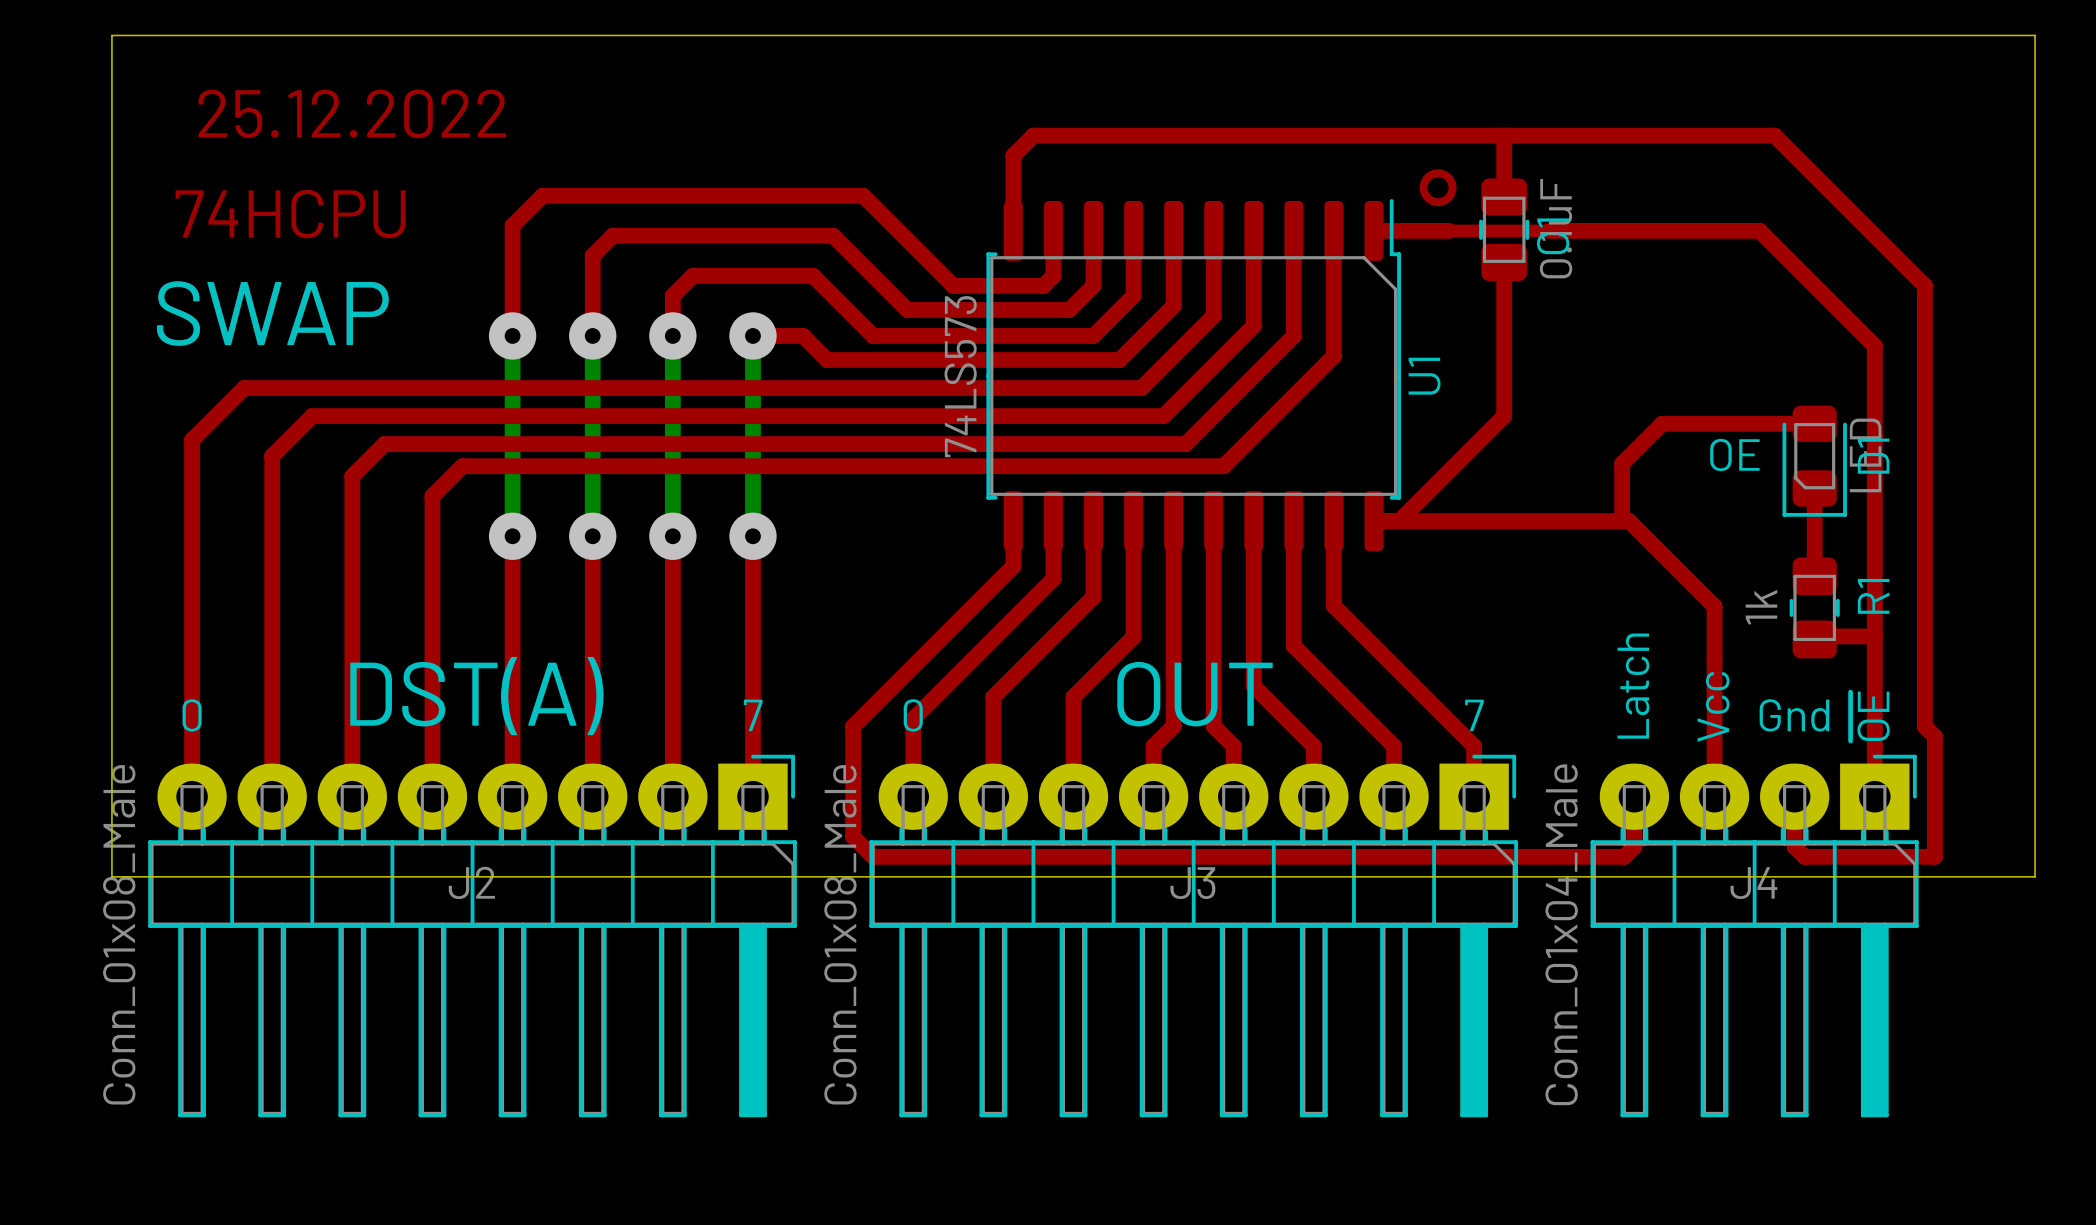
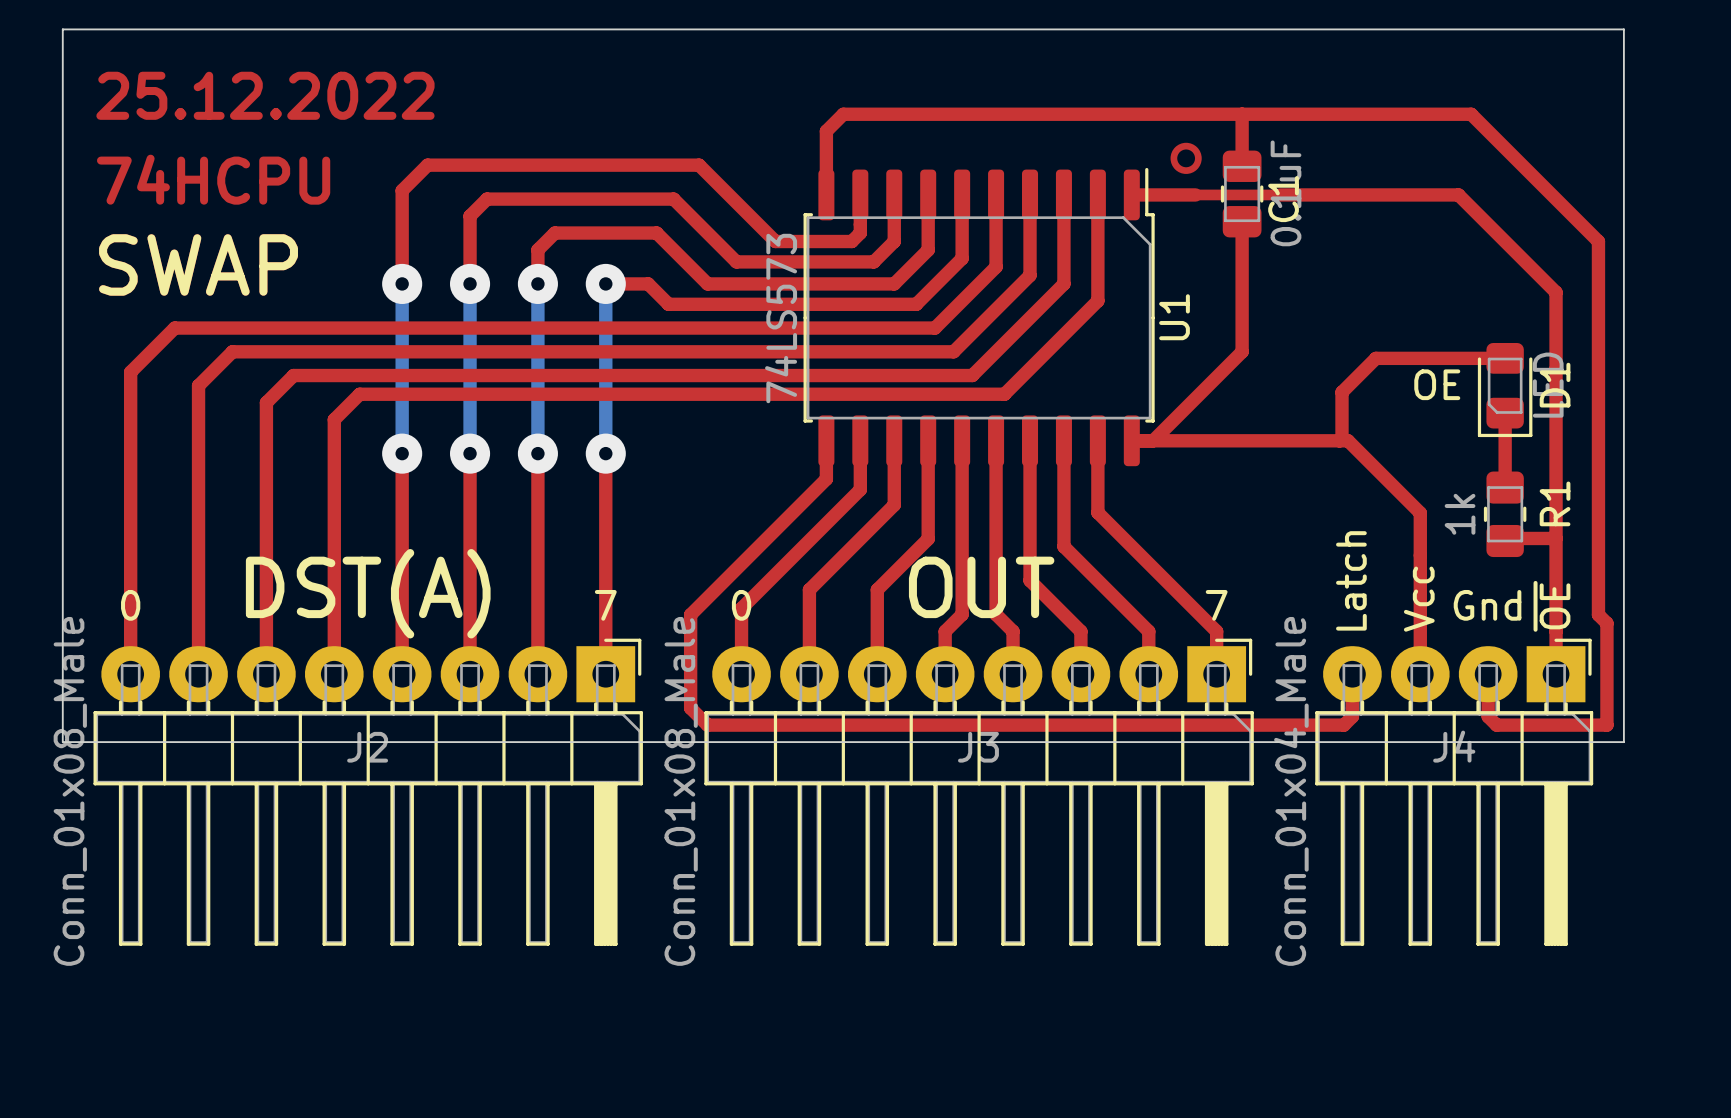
board edge: (1954, 35) (2035, 35) (2035, 876) (1954, 876) -> (1623, 29) (1623, 742)

